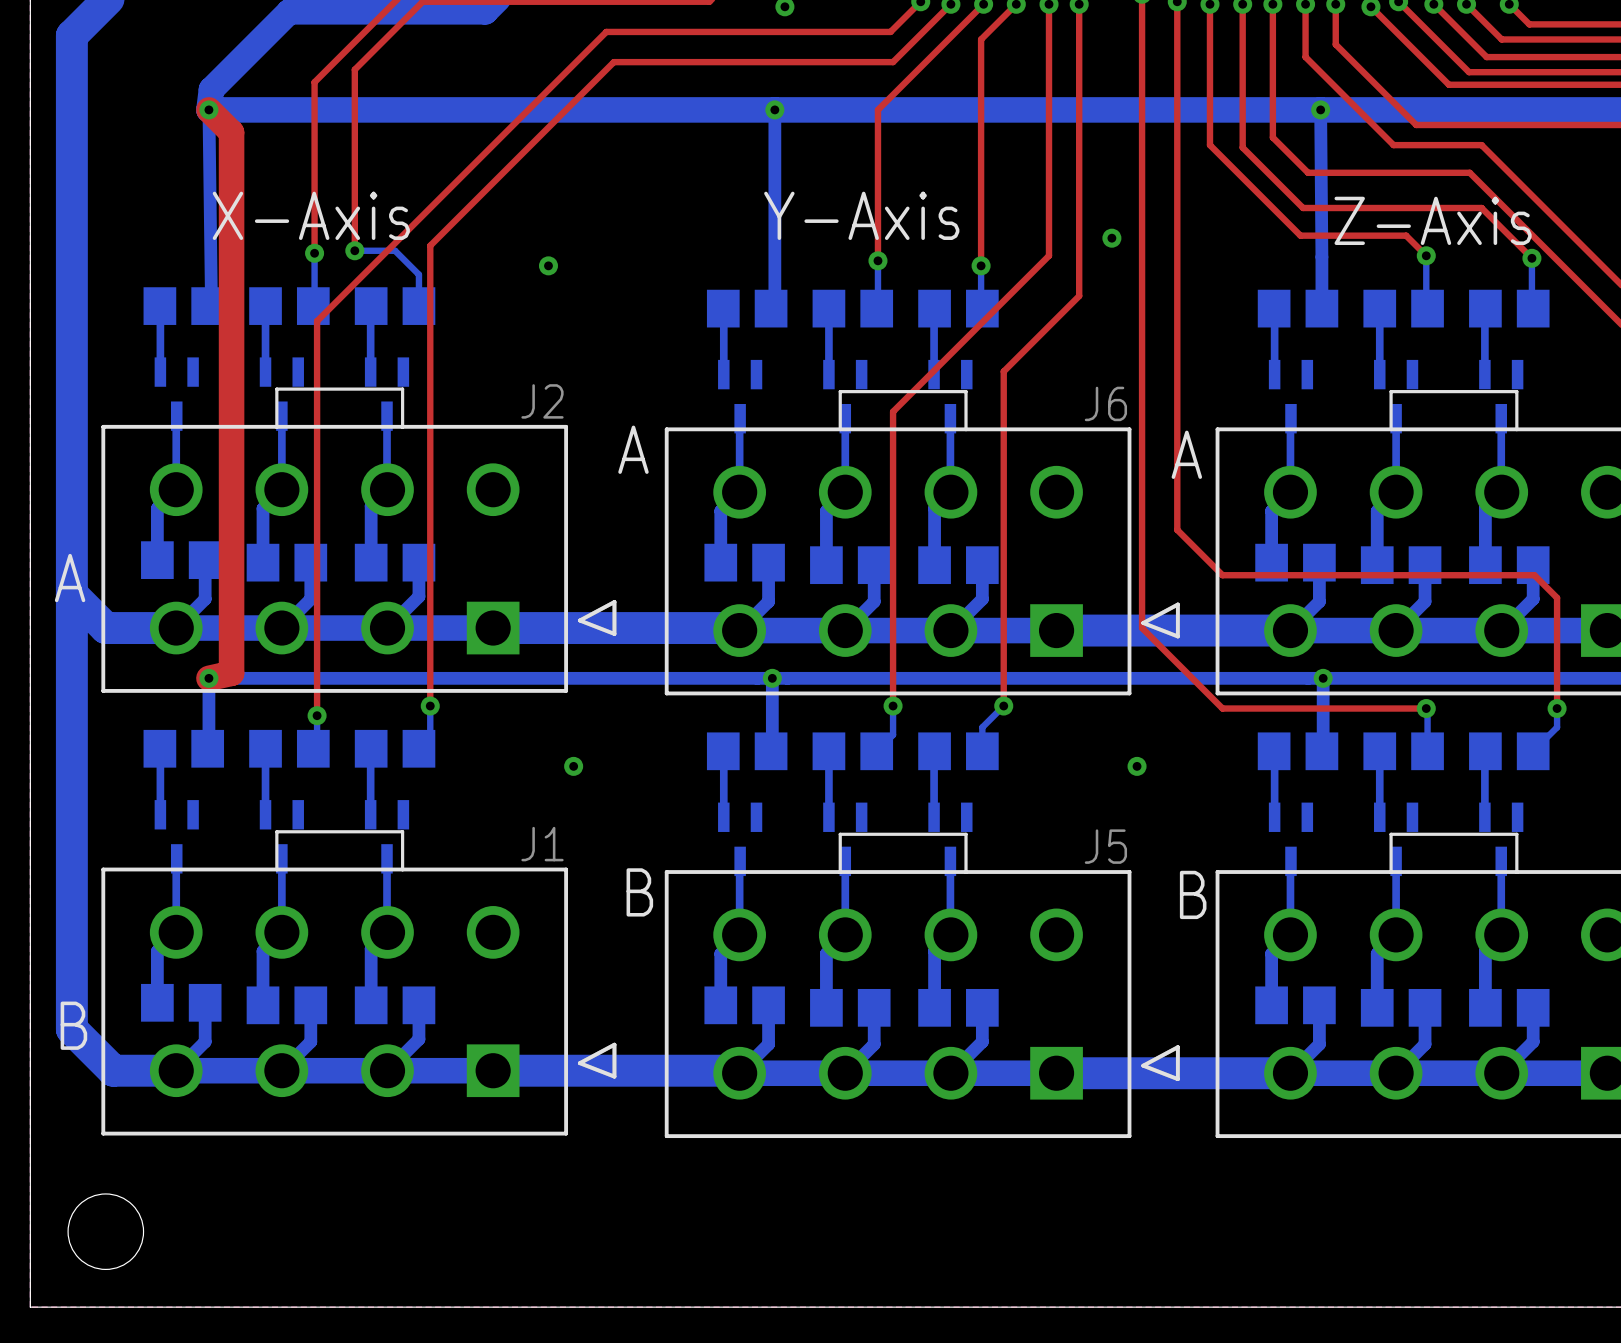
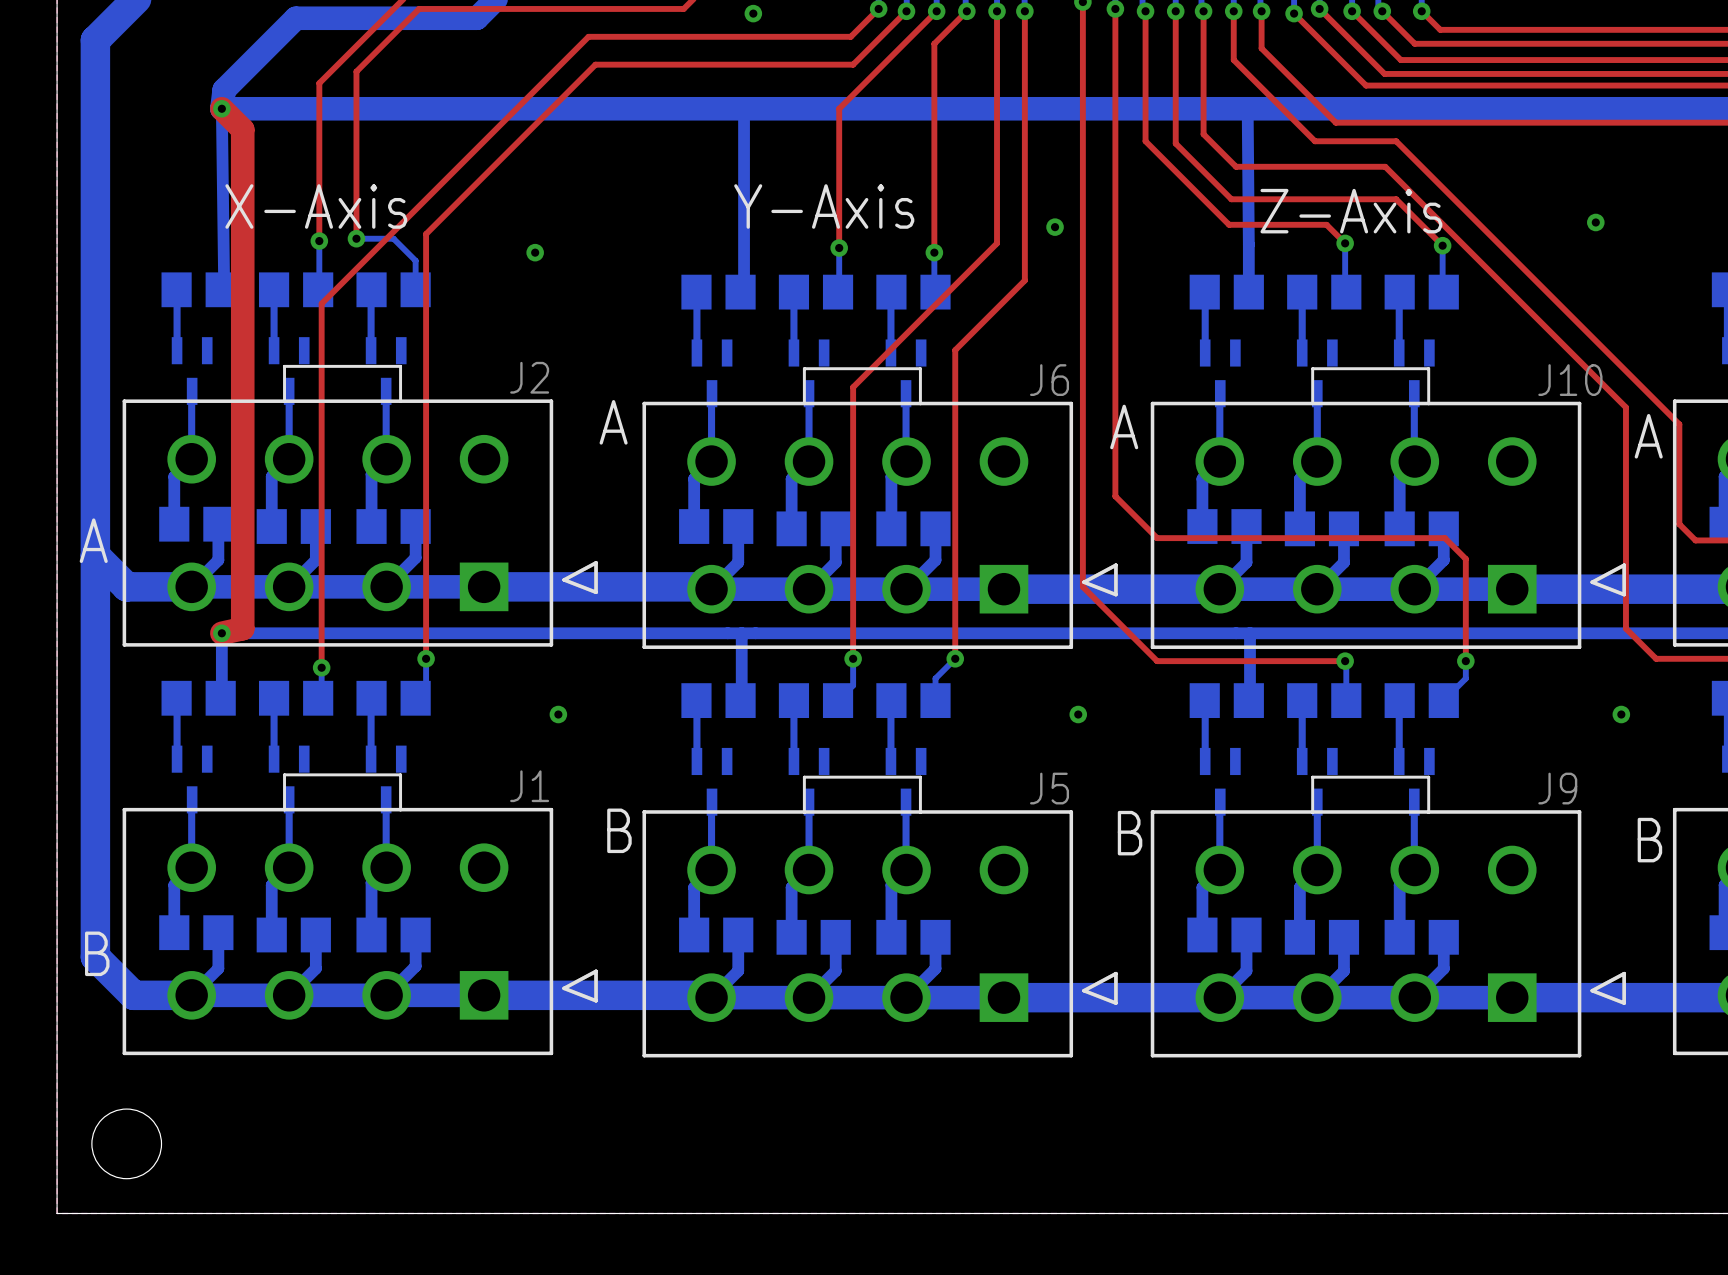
via: (774, 109) -> none
via: (1320, 109) -> none
via: (772, 678) -> none
via: (1323, 678) -> none

